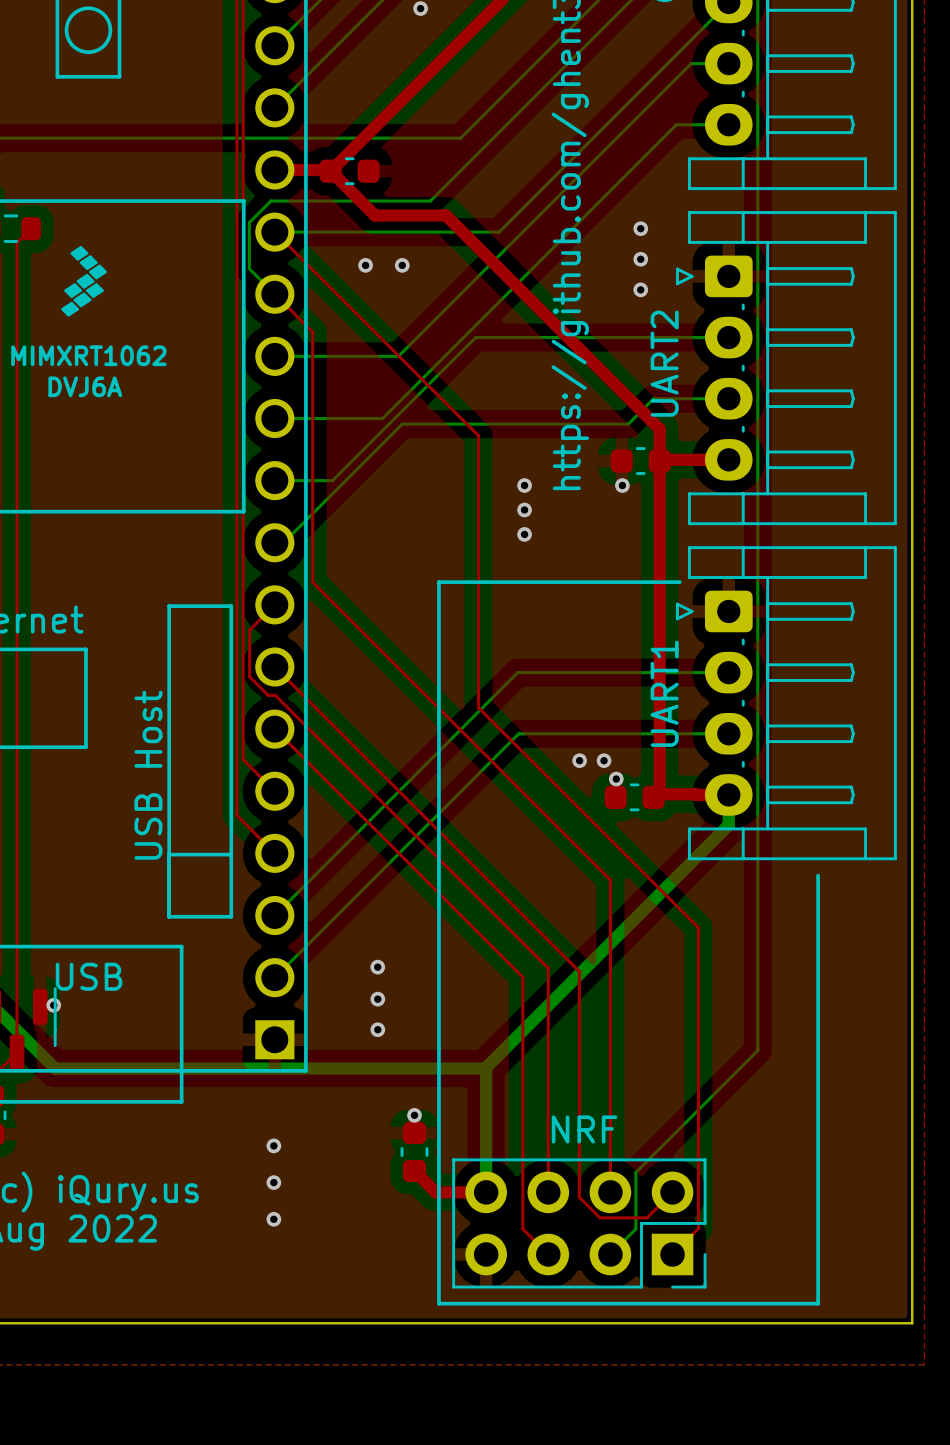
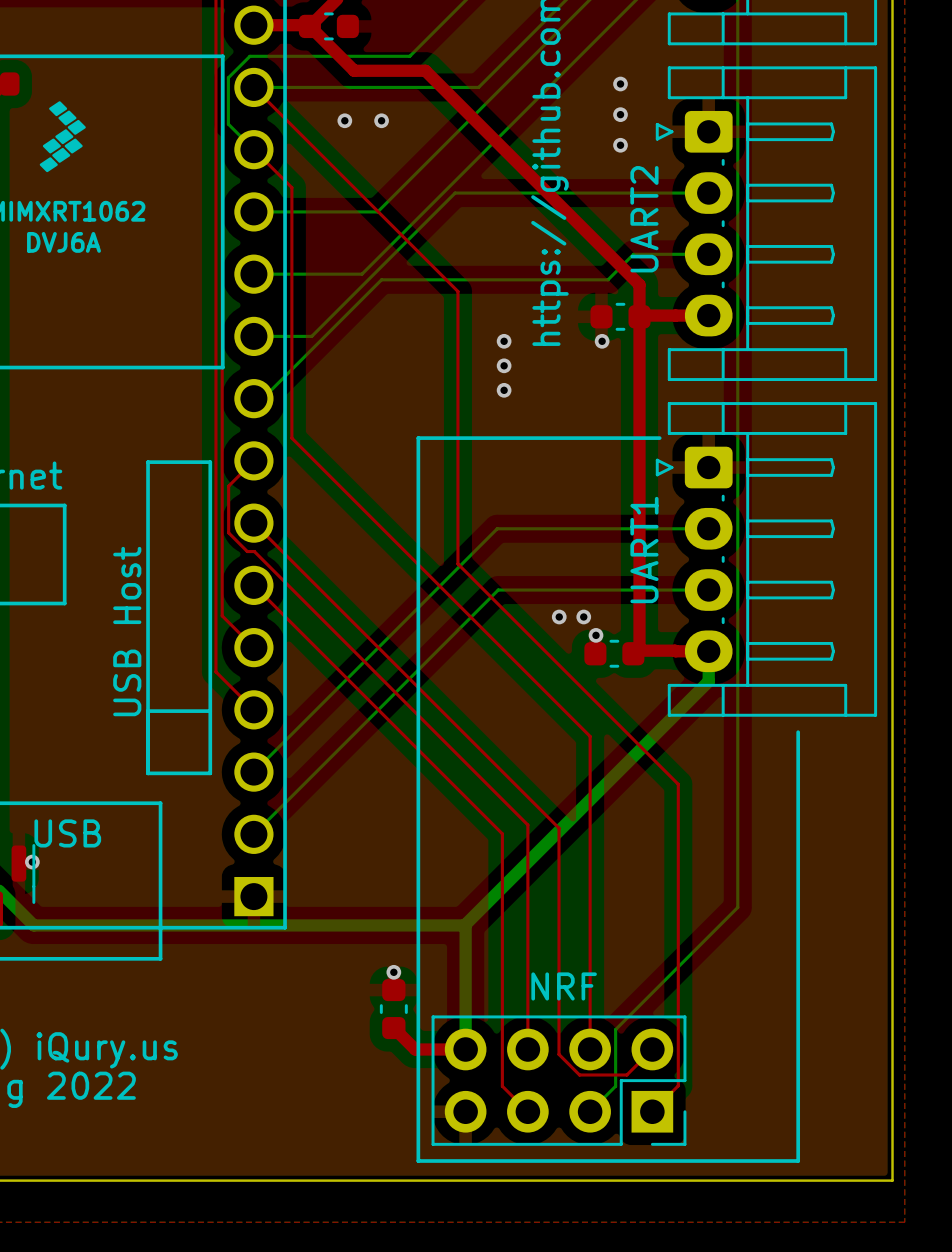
via: (377, 967) -> none
via: (377, 999) -> none
via: (377, 1029) -> none
via: (273, 1145) -> none
via: (273, 1182) -> none
via: (273, 1219) -> none

